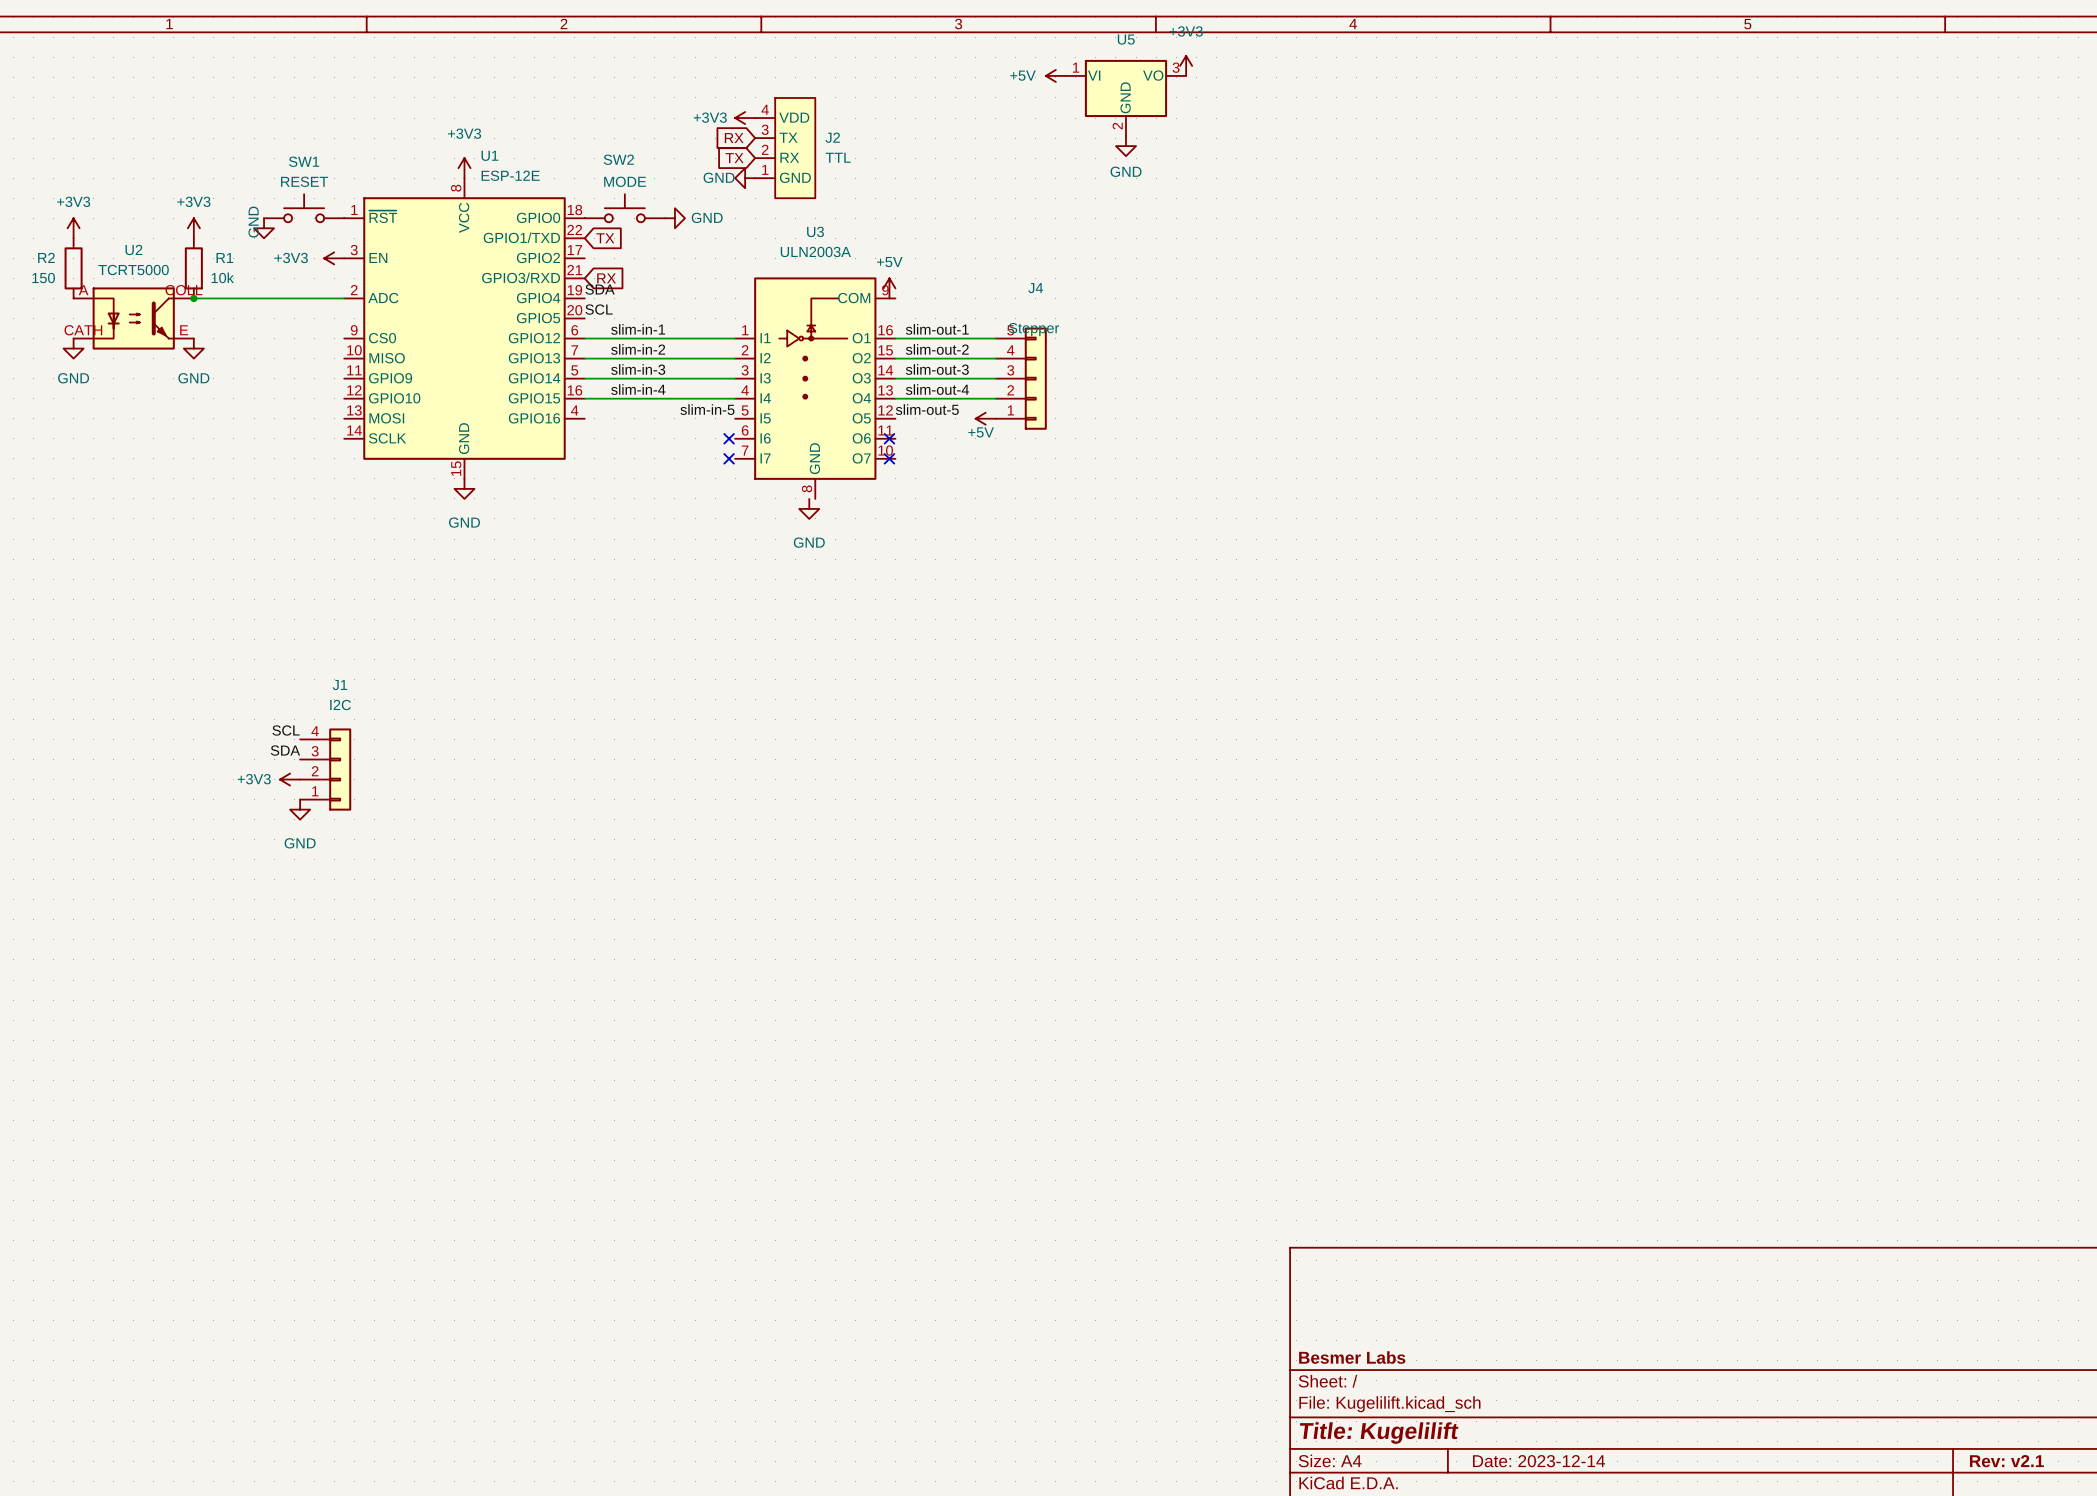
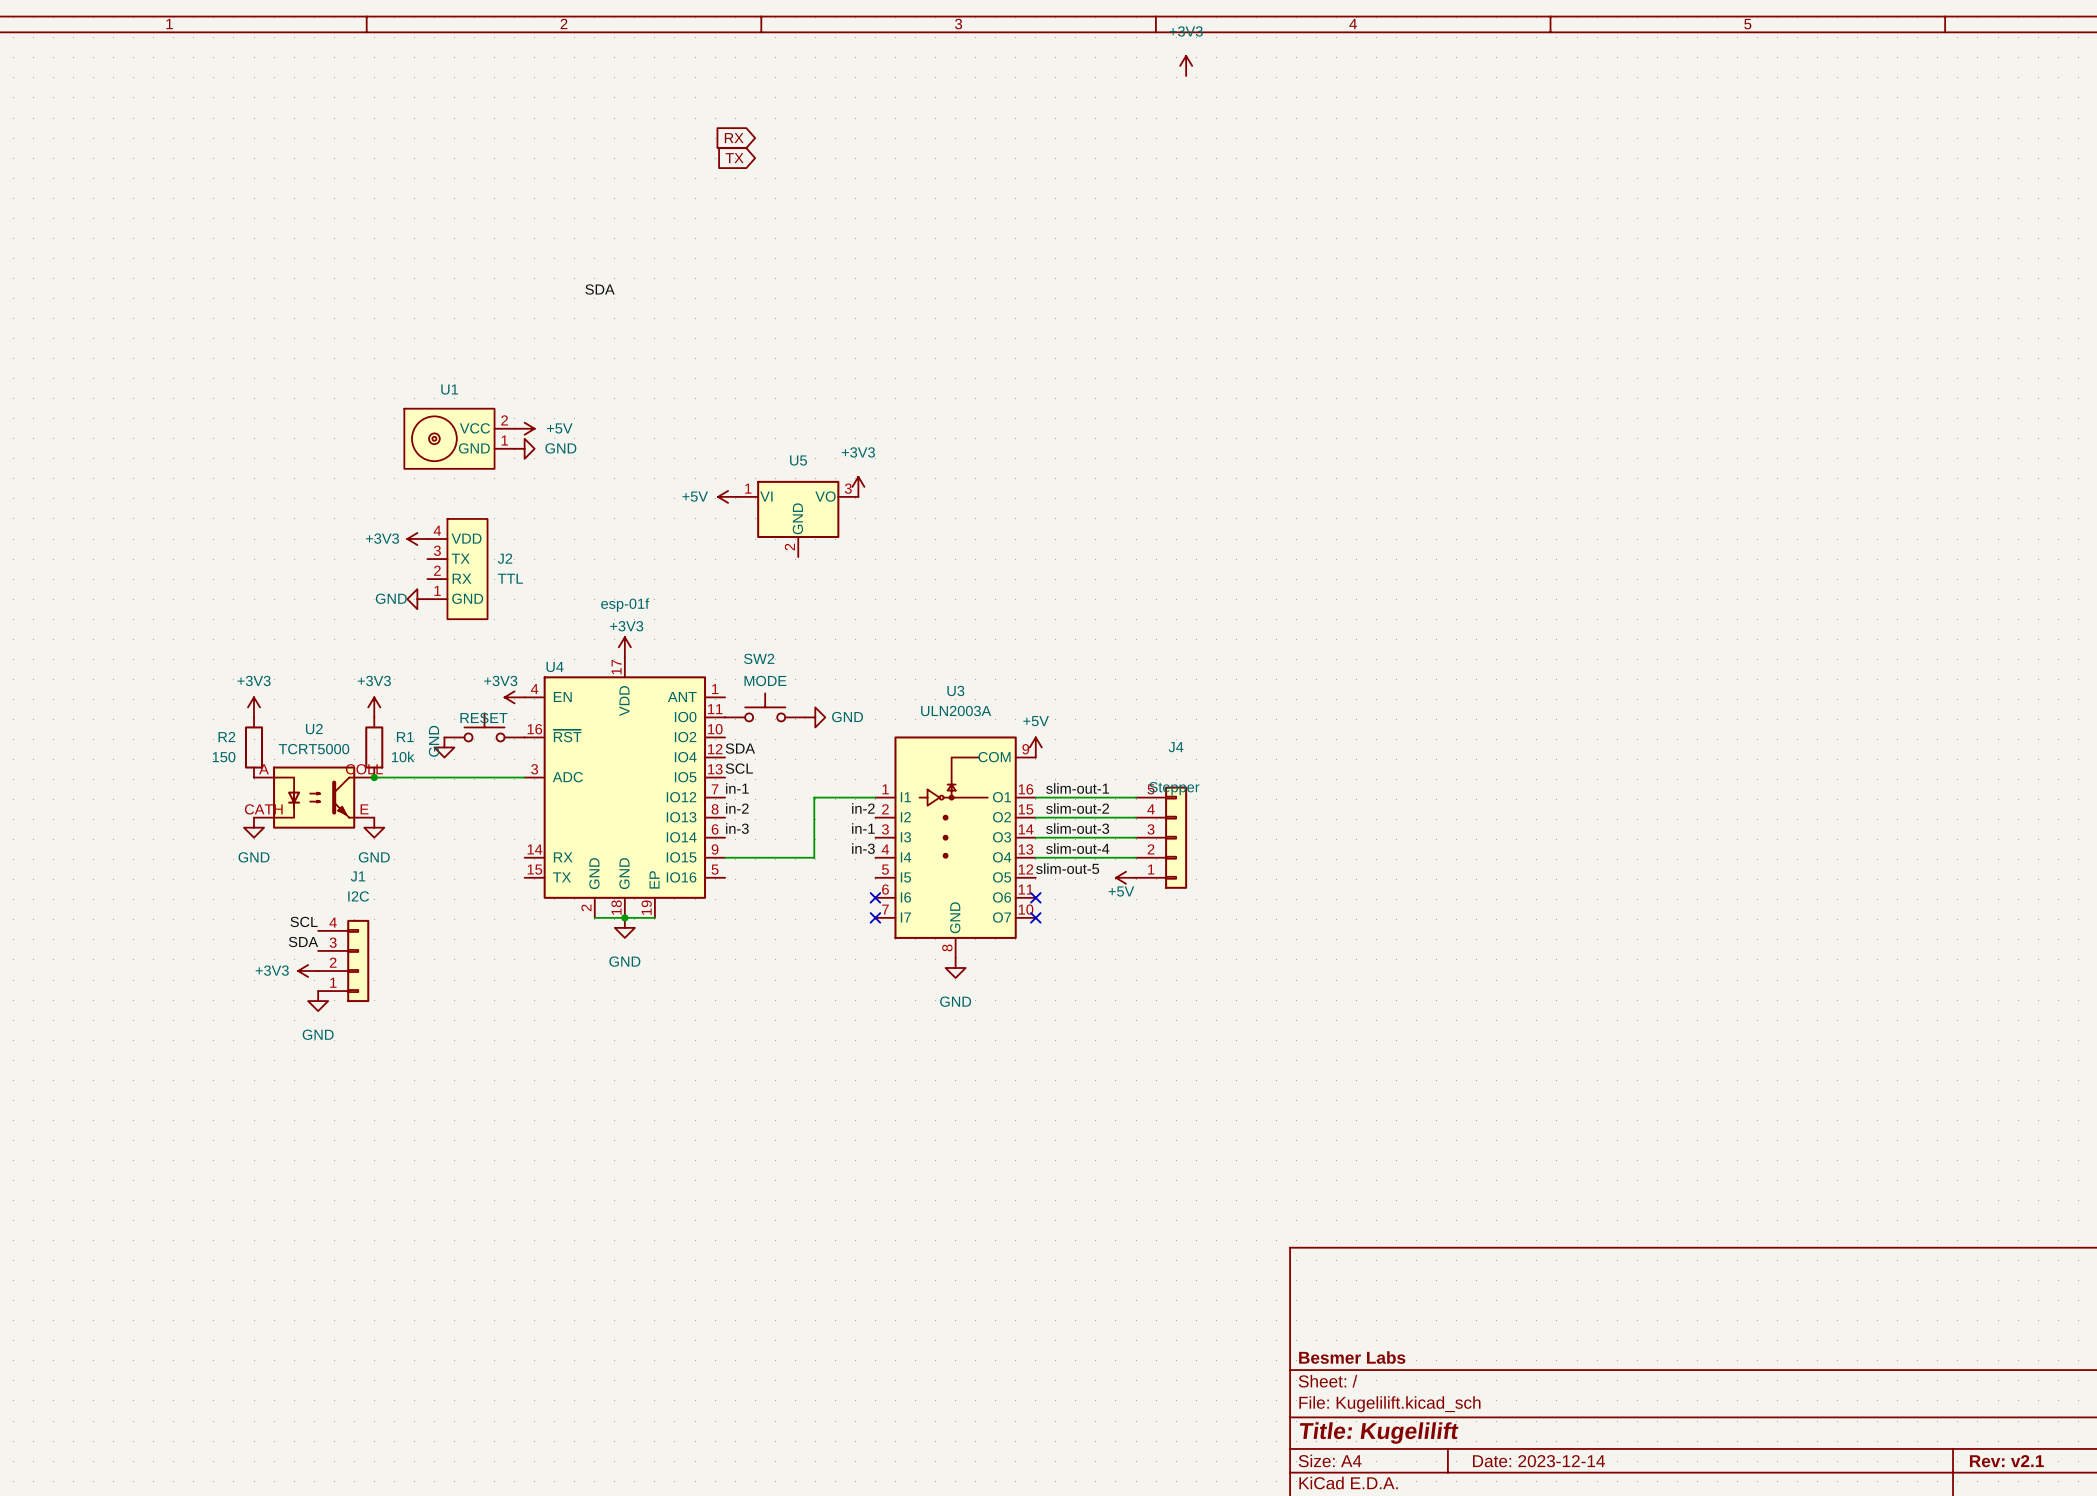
power symbol: +5V (1055, 75) -> none
U5 position: (1126, 97) -> (798, 518)
power symbol: +3V3 (745, 118) -> none
power symbol: GND (1126, 146) -> none
J2 position: (785, 148) -> (457, 569)
U1 name position: U1 (489, 155) -> U1 (449, 389)
power symbol: +3V3 (464, 168) -> none
U1 value: ESP-12E (510, 175) -> none
U1 symbol: [344, 178, 585, 479] -> [404, 408, 515, 469]
power symbol: GND (745, 178) -> none
SW1: RESET (304, 208) -> none
SW2 position: (624, 208) -> (765, 707)
power symbol: GND (674, 218) -> none
power symbol: +3V3 (73, 228) -> none
power symbol: +3V3 (193, 228) -> none
power symbol: GND (264, 228) -> none
global label: TX (605, 238) -> none
power symbol: +3V3 (334, 258) -> none
R2 position: (73, 268) -> (254, 747)
R1 position: (193, 268) -> (374, 747)
global label: RX (606, 278) -> none
power symbol: +5V (889, 288) -> none
wire: (193, 298) (344, 298) -> none
junction: (193, 298) -> none
label: SCL (599, 309) -> none
U2 position: (133, 318) -> (314, 797)
label: slim-in-1 (638, 329) -> none
label: slim-out-1 (937, 329) -> none
wire: (584, 338) (735, 338) -> none
wire: (895, 338) (995, 338) -> none
power symbol: GND (73, 348) -> none
power symbol: GND (193, 348) -> none
label: slim-in-2 (638, 349) -> none
label: slim-out-2 (937, 349) -> none
wire: (584, 358) (735, 358) -> none
wire: (895, 358) (995, 358) -> none
label: slim-in-3 (638, 369) -> none
label: slim-out-3 (937, 369) -> none
wire: (584, 378) (735, 378) -> none
wire: (895, 378) (995, 378) -> none
J4 position: (1021, 378) -> (1161, 837)
U3 position: (815, 388) -> (955, 847)
label: slim-in-4 (638, 389) -> none
label: slim-out-4 (937, 389) -> none
wire: (584, 398) (735, 398) -> none
wire: (895, 398) (995, 398) -> none
label: slim-in-5 (707, 409) -> none
label: slim-out-5 (927, 409) -> none
power symbol: +5V (985, 418) -> none
power symbol: none -> +5V (524, 428)
no-connect mark: (729, 438) -> none
no-connect mark: (889, 438) -> none
power symbol: none -> GND (524, 448)
no-connect mark: (729, 458) -> none
no-connect mark: (889, 458) -> none
power symbol: none -> +3V3 (858, 486)
power symbol: GND (464, 488) -> none
power symbol: none -> +5V (728, 496)
power symbol: GND (809, 508) -> none
power symbol: none -> +3V3 (417, 539)
power symbol: none -> GND (417, 599)
power symbol: none -> +3V3 (624, 647)
power symbol: none -> +3V3 (514, 697)
power symbol: none -> +3V3 (254, 707)
power symbol: none -> +3V3 (374, 707)
power symbol: none -> GND (815, 717)
part: none -> RESET (484, 727)
label position: SCL (286, 730) -> SCL (304, 921)
power symbol: none -> GND (444, 747)
power symbol: none -> +5V (1035, 747)
label: none -> SDA (740, 748)
label position: SDA (285, 750) -> SDA (303, 942)
label: none -> SCL (739, 768)
J1 position: (325, 769) -> (343, 960)
wire: none -> (374, 777) (524, 777)
junction: none -> (374, 777)
power symbol: +3V3 (290, 779) -> none
U4: none -> esp-01f (624, 787)
label: none -> in-1 (737, 788)
label: none -> slim-out-1 (1077, 788)
wire: none -> (875, 797) (814, 797) (814, 857) (725, 857)
wire: none -> (1035, 797) (1136, 797)
label: none -> in-2 (737, 808)
label: none -> in-2 (863, 808)
label: none -> slim-out-2 (1077, 808)
power symbol: GND (300, 809) -> none
wire: none -> (1035, 817) (1136, 817)
power symbol: none -> GND (254, 827)
power symbol: none -> GND (374, 827)
label: none -> in-3 (737, 828)
label: none -> in-1 (863, 828)
label: none -> slim-out-3 (1077, 828)
wire: none -> (1035, 837) (1136, 837)
label: none -> in-3 (863, 848)
label: none -> slim-out-4 (1077, 848)
wire: none -> (1035, 857) (1136, 857)
label: none -> slim-out-5 (1067, 868)
power symbol: none -> +5V (1126, 877)
no-connect mark: none -> (875, 897)
no-connect mark: none -> (1035, 897)
wire: none -> (594, 917) (654, 917)
junction: none -> (624, 917)
no-connect mark: none -> (875, 917)
no-connect mark: none -> (1035, 917)
power symbol: none -> GND (624, 927)
power symbol: none -> GND (955, 967)
power symbol: none -> +3V3 (308, 970)
power symbol: none -> GND (318, 1001)

